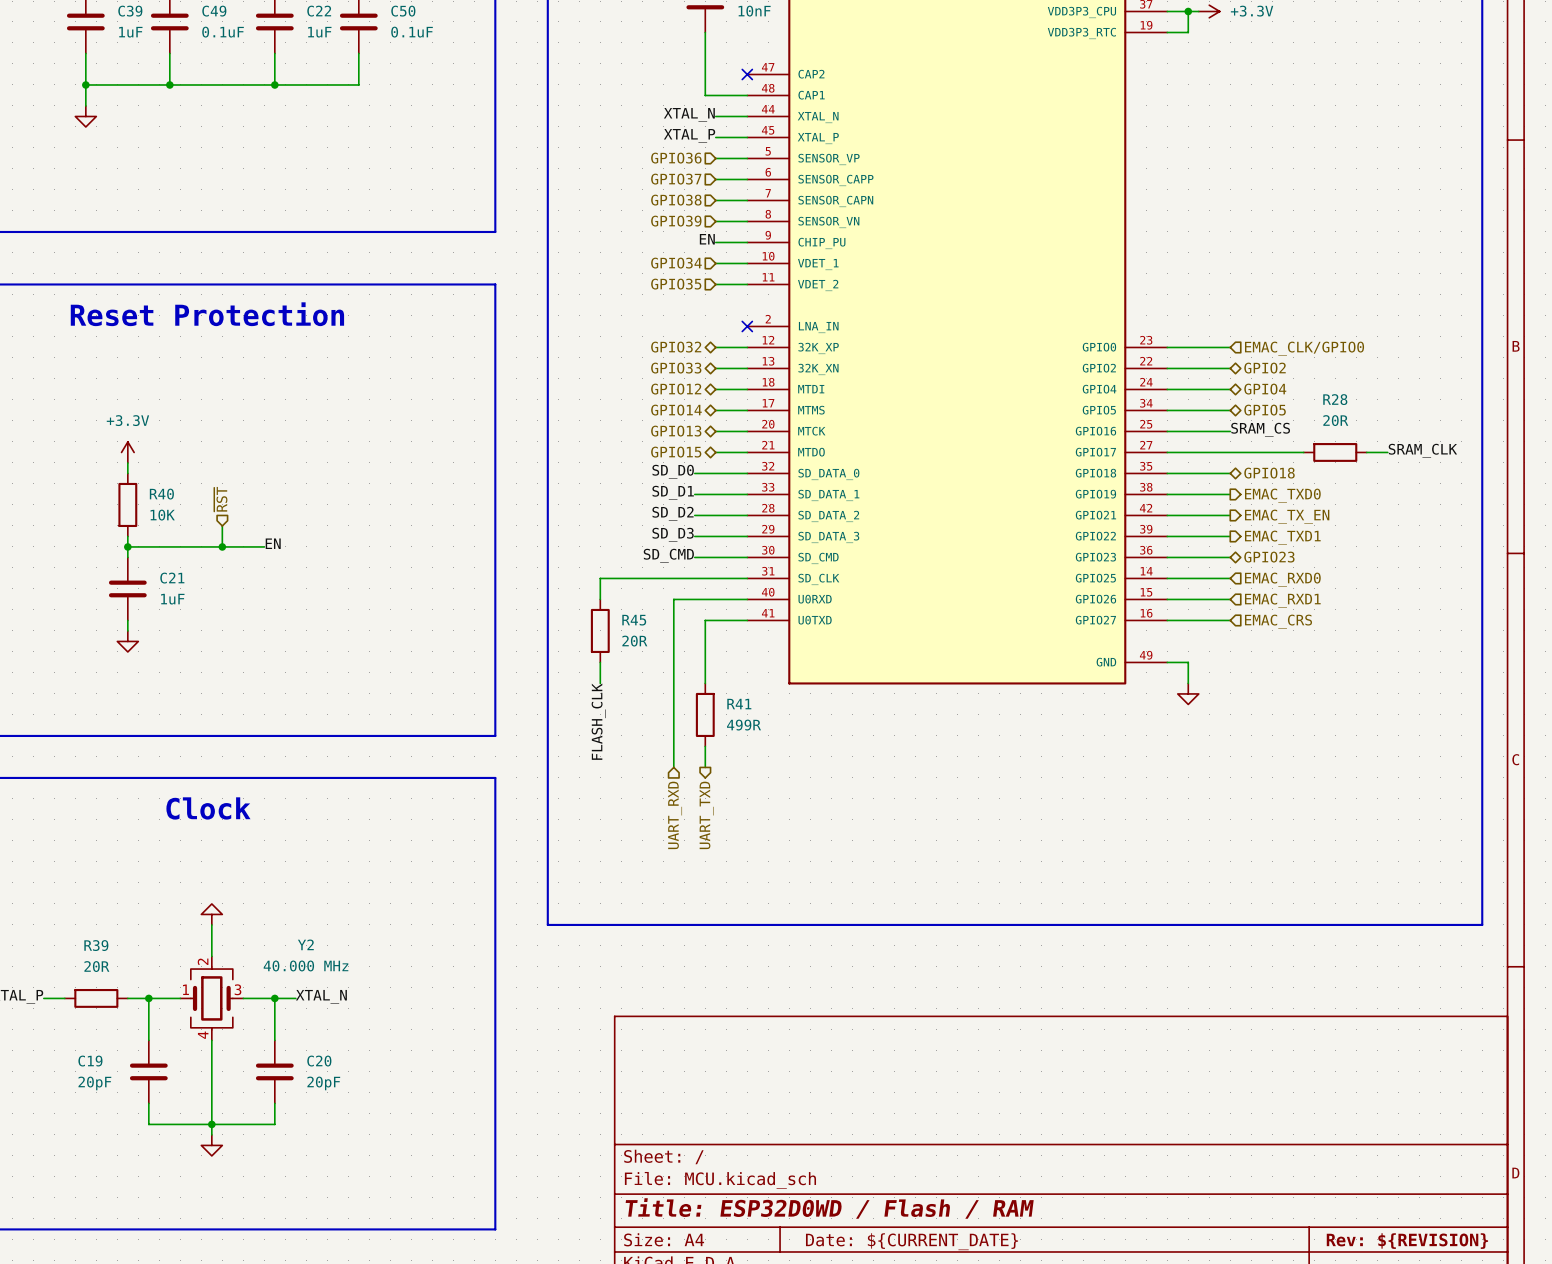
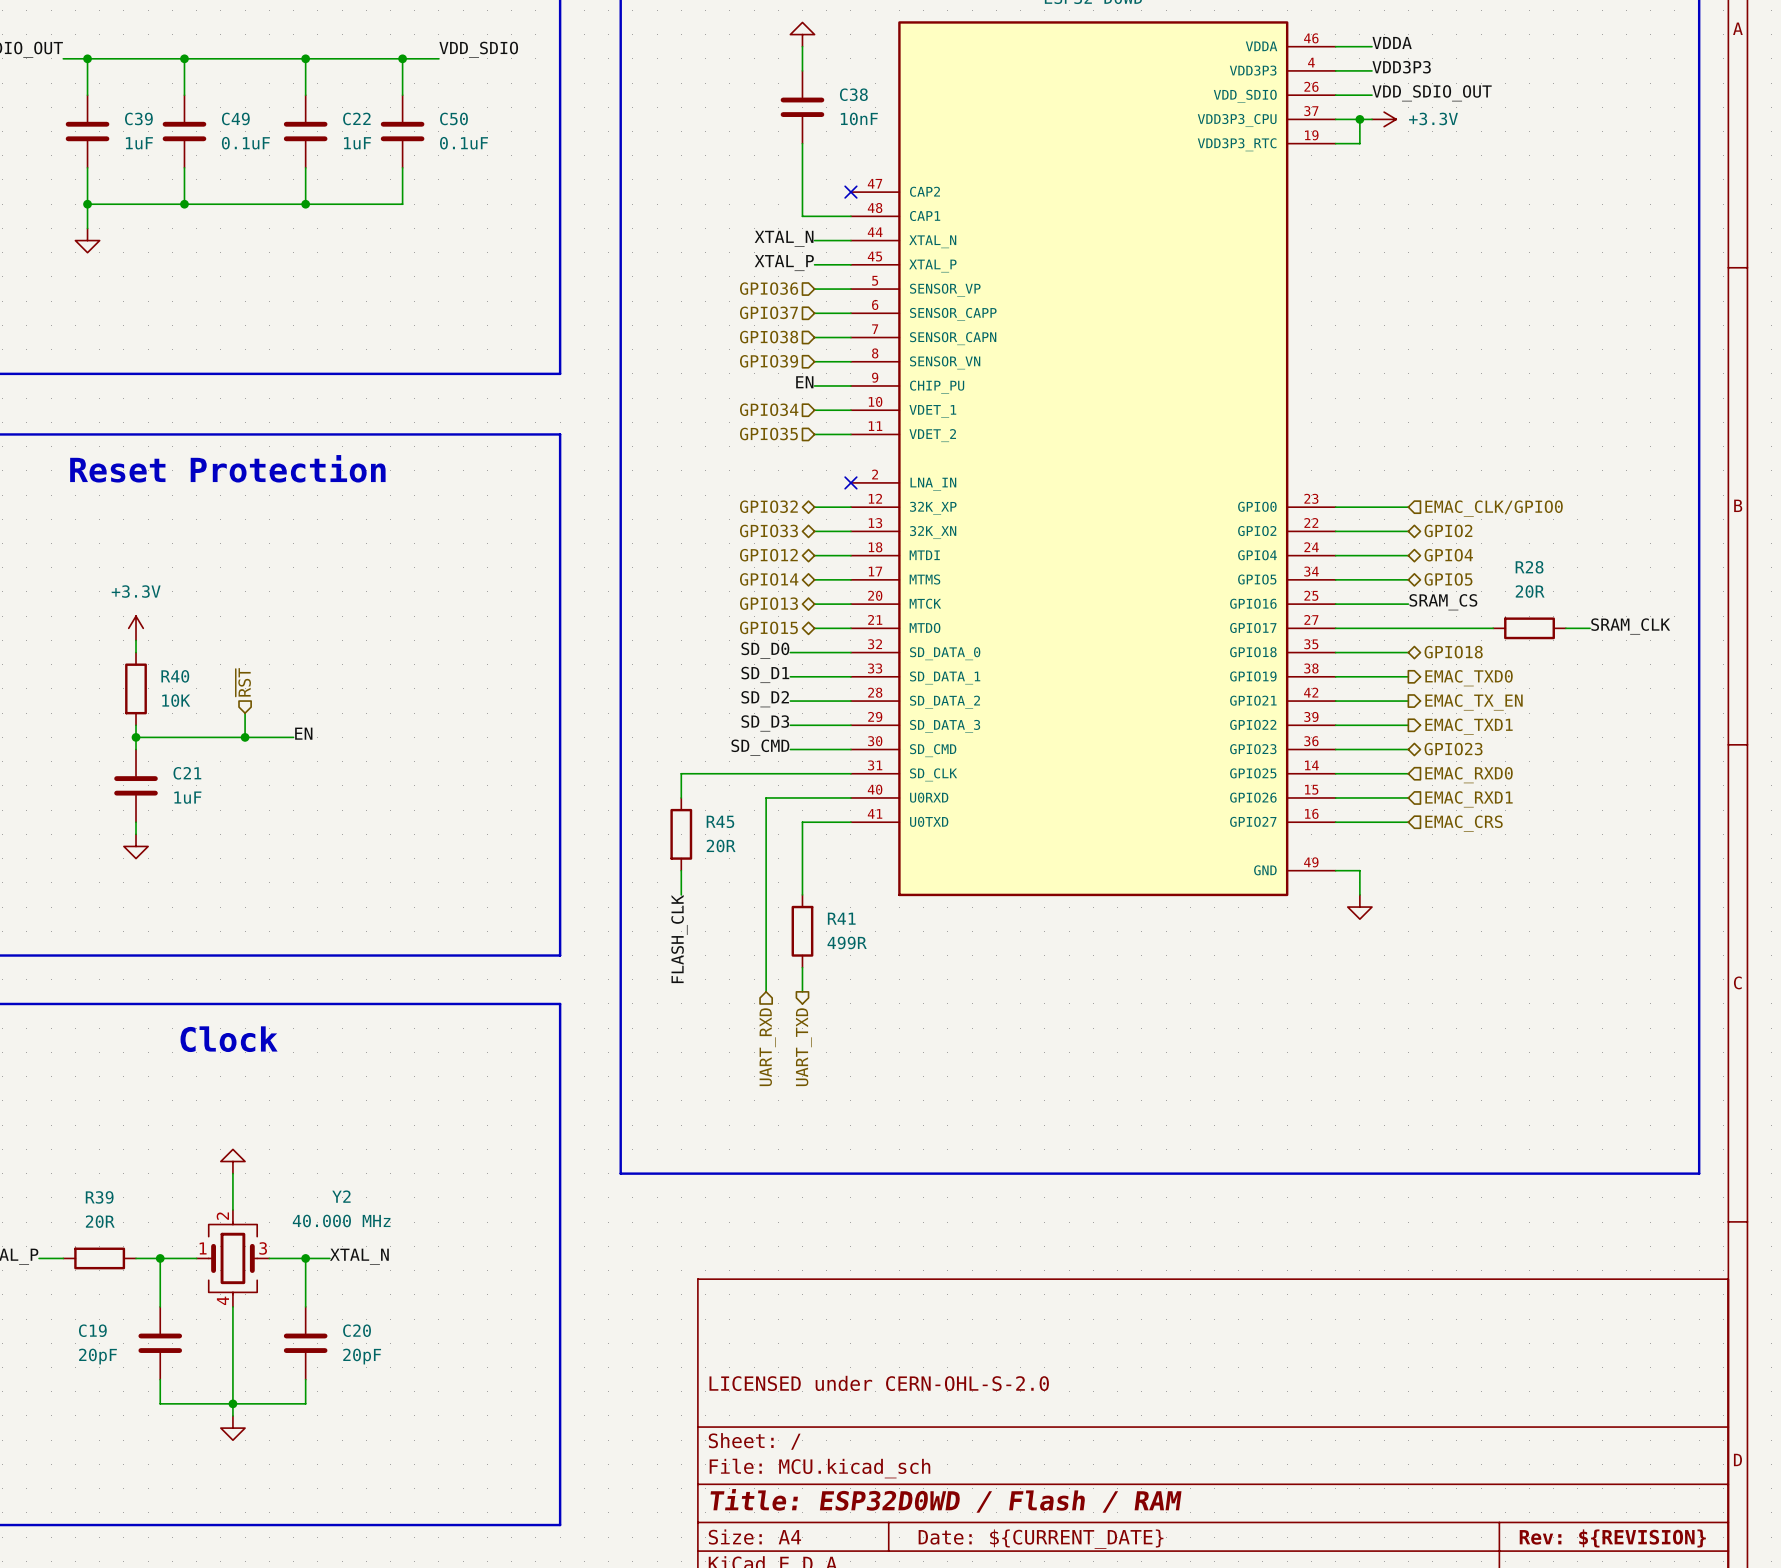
title block: none -> LICENSED under CERN-OHL-S-2.0 (879, 1383)

